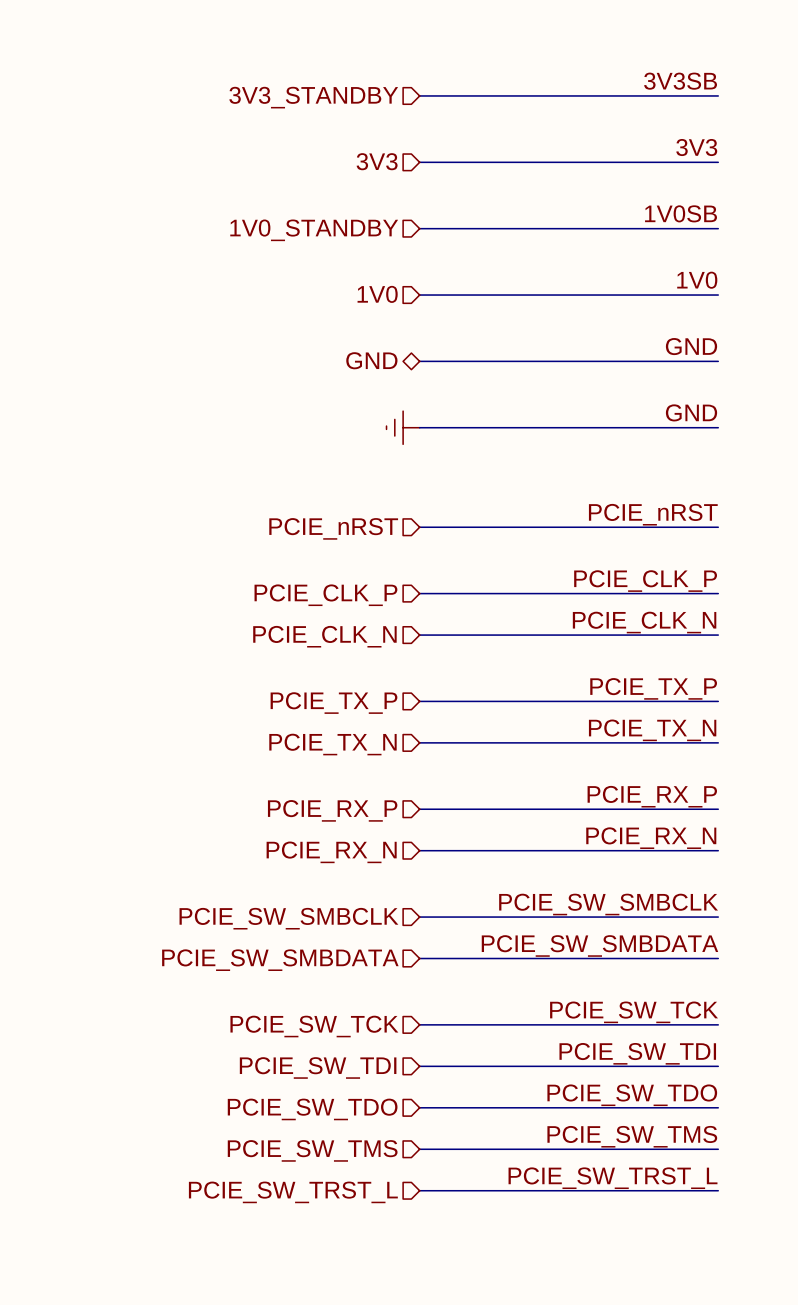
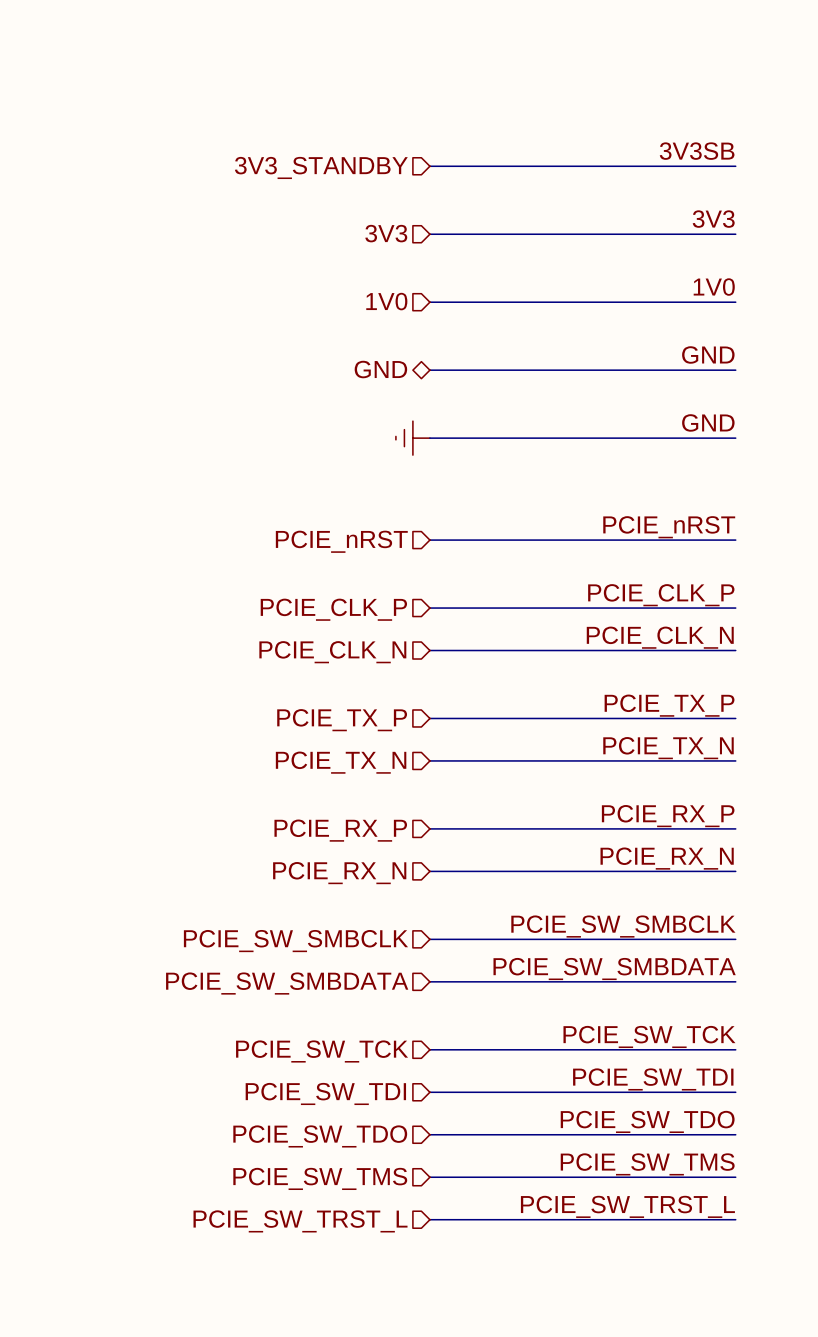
label: 3V3SB (680, 81) -> none
wire: (419, 95) (718, 95) -> none
hierarchical label: 3V3_STANDBY (313, 97) -> none
label: 3V3 (696, 147) -> 3V3SB (697, 151)
hierarchical label: 3V3 (377, 161) -> 3V3_STANDBY (321, 167)
label: 1V0SB (681, 213) -> 3V3 (713, 219)
hierarchical label: 1V0_STANDBY (314, 230) -> 3V3 (386, 233)

